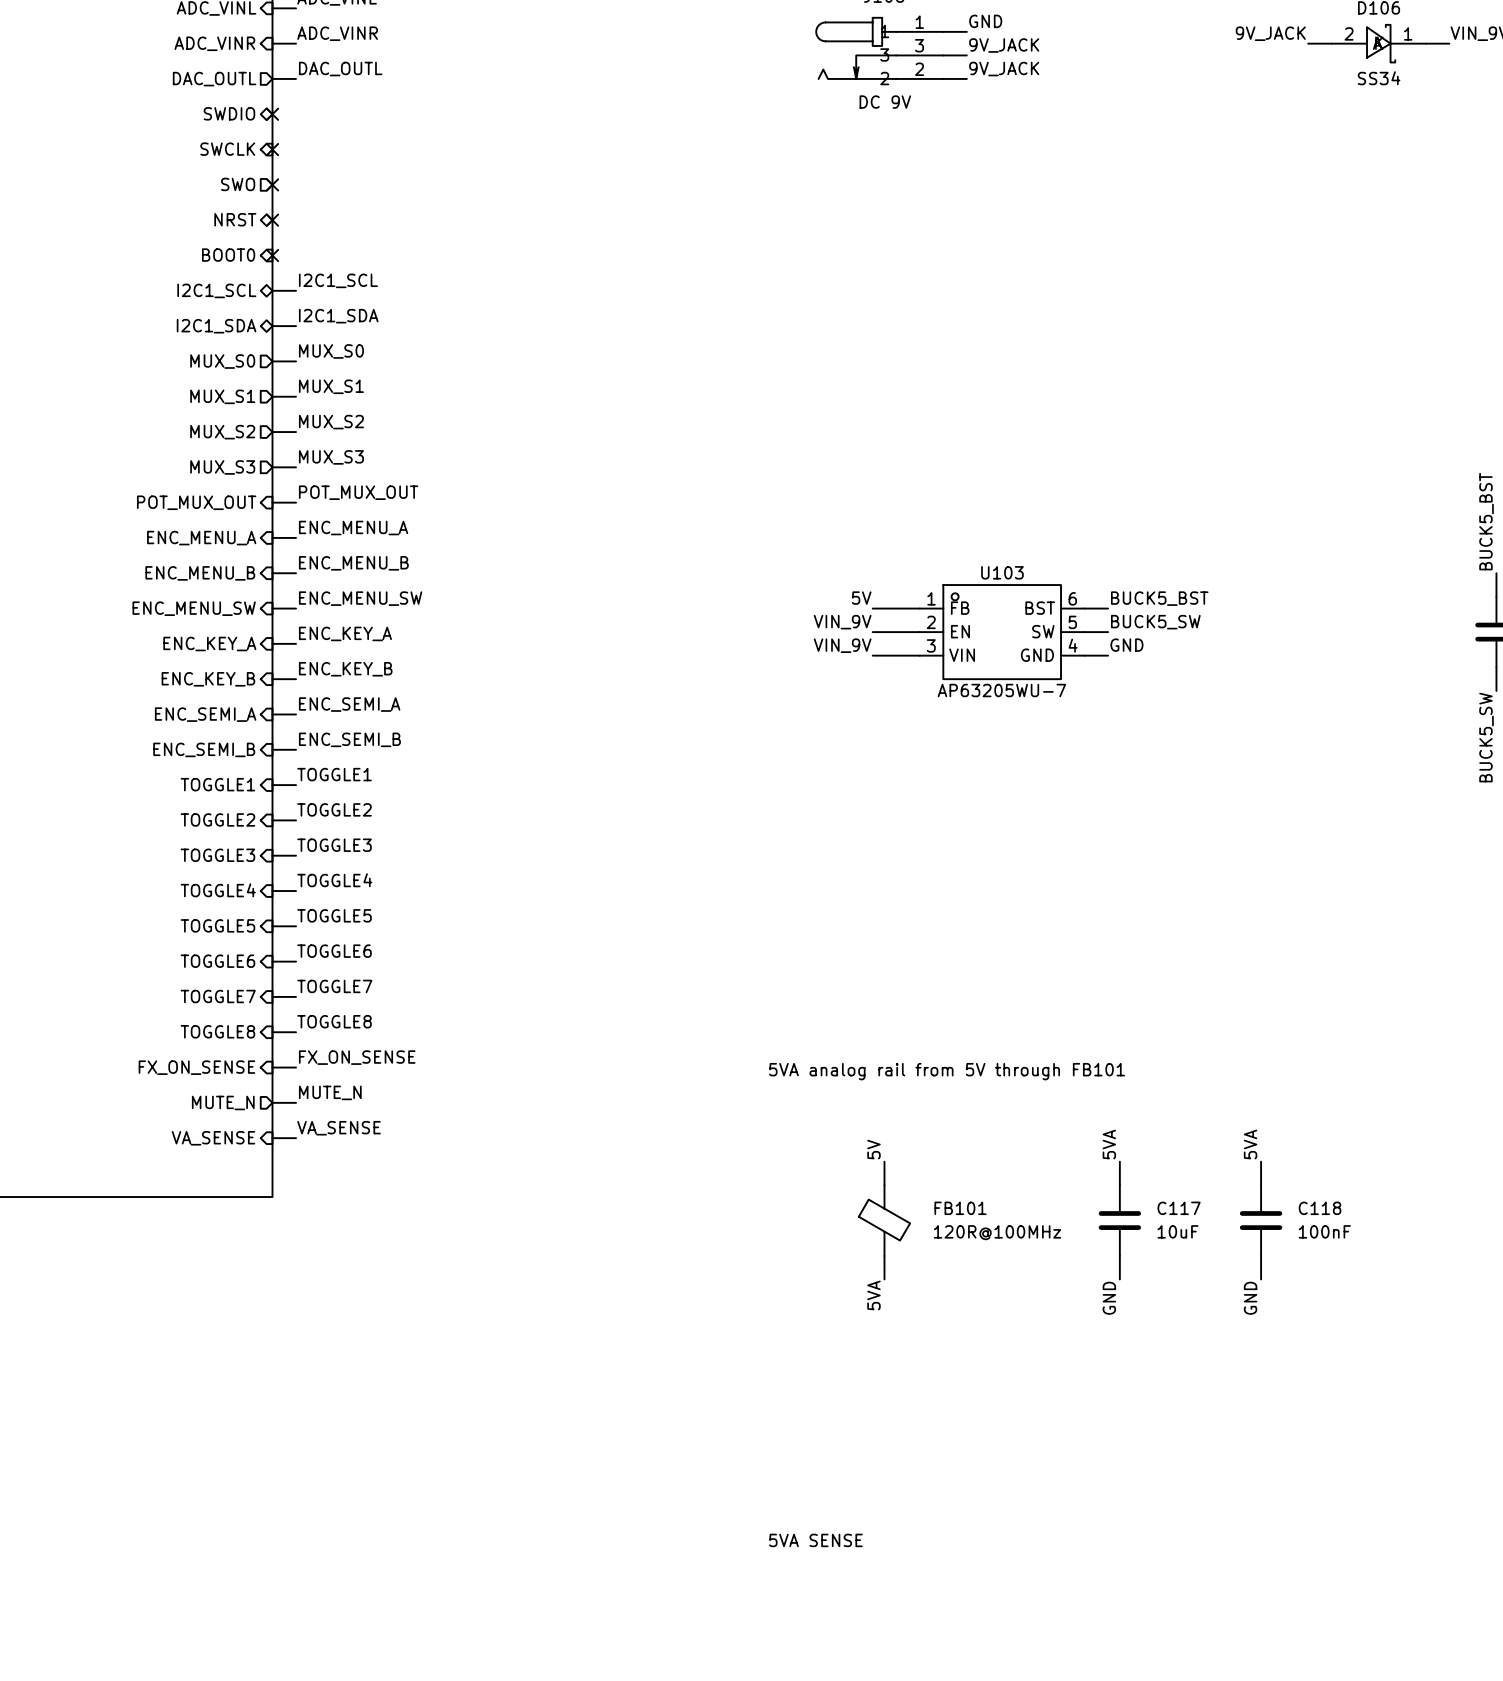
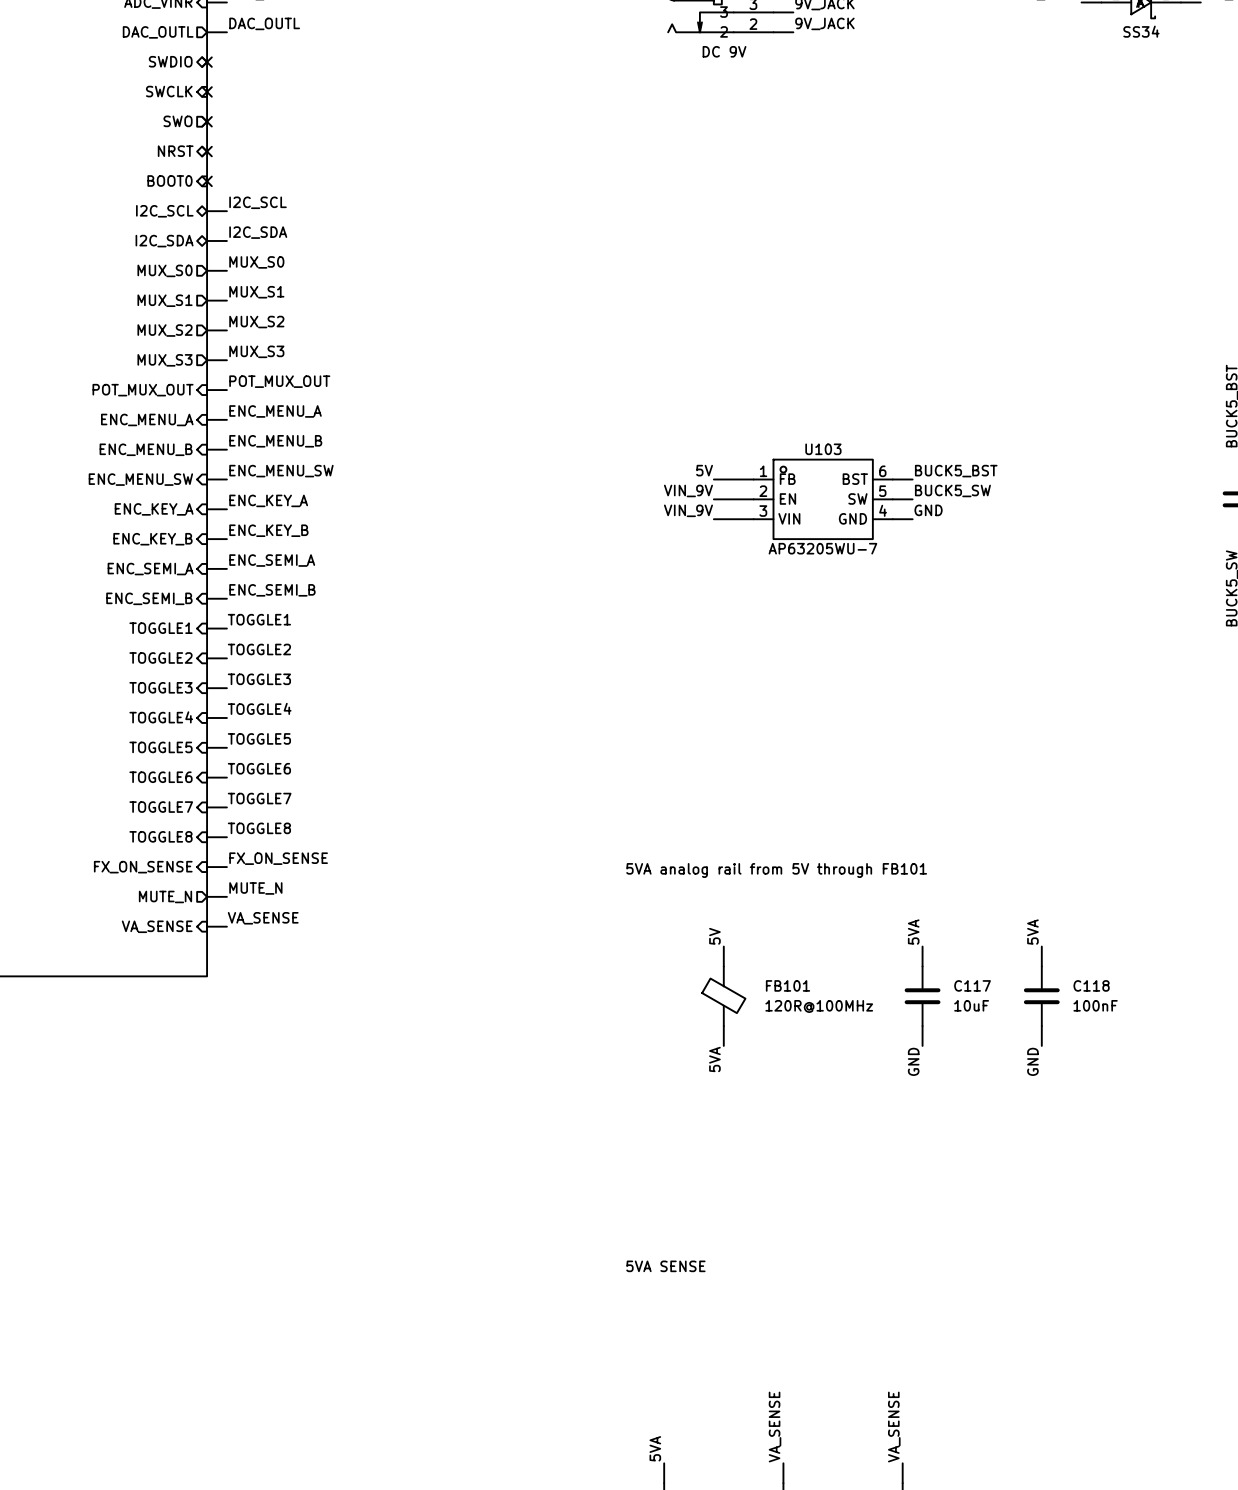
label: I2C1_SCL (338, 280) -> I2C_SCL (258, 202)
sheet pin: I2C1_SCL (216, 290) -> I2C_SCL (164, 211)
label: I2C1_SDA (338, 316) -> I2C_SDA (258, 232)
sheet pin: I2C1_SDA (216, 326) -> I2C_SDA (164, 241)

